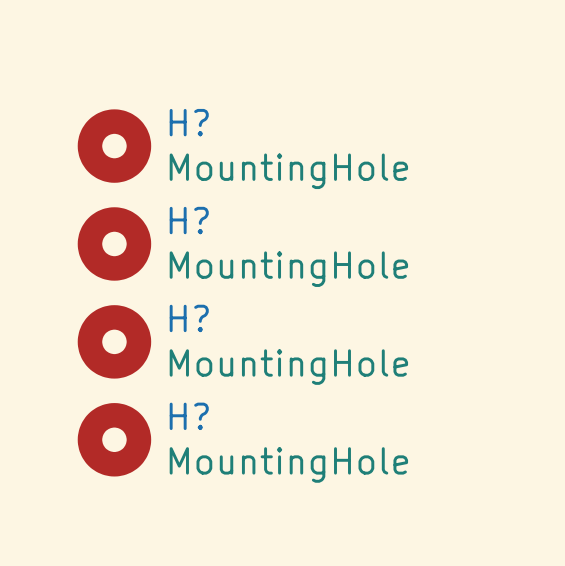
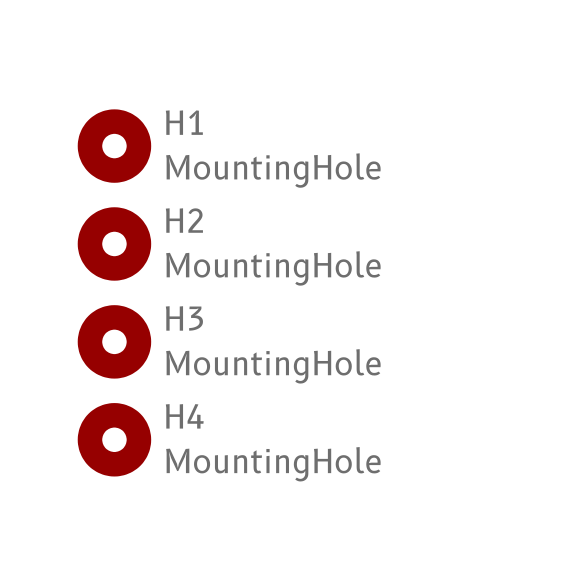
H? name: H? (189, 122) -> H1 (184, 122)
H? name: H? (189, 220) -> H2 (184, 220)
H? name: H? (189, 318) -> H3 (184, 318)
H? name: H? (189, 416) -> H4 (184, 416)

